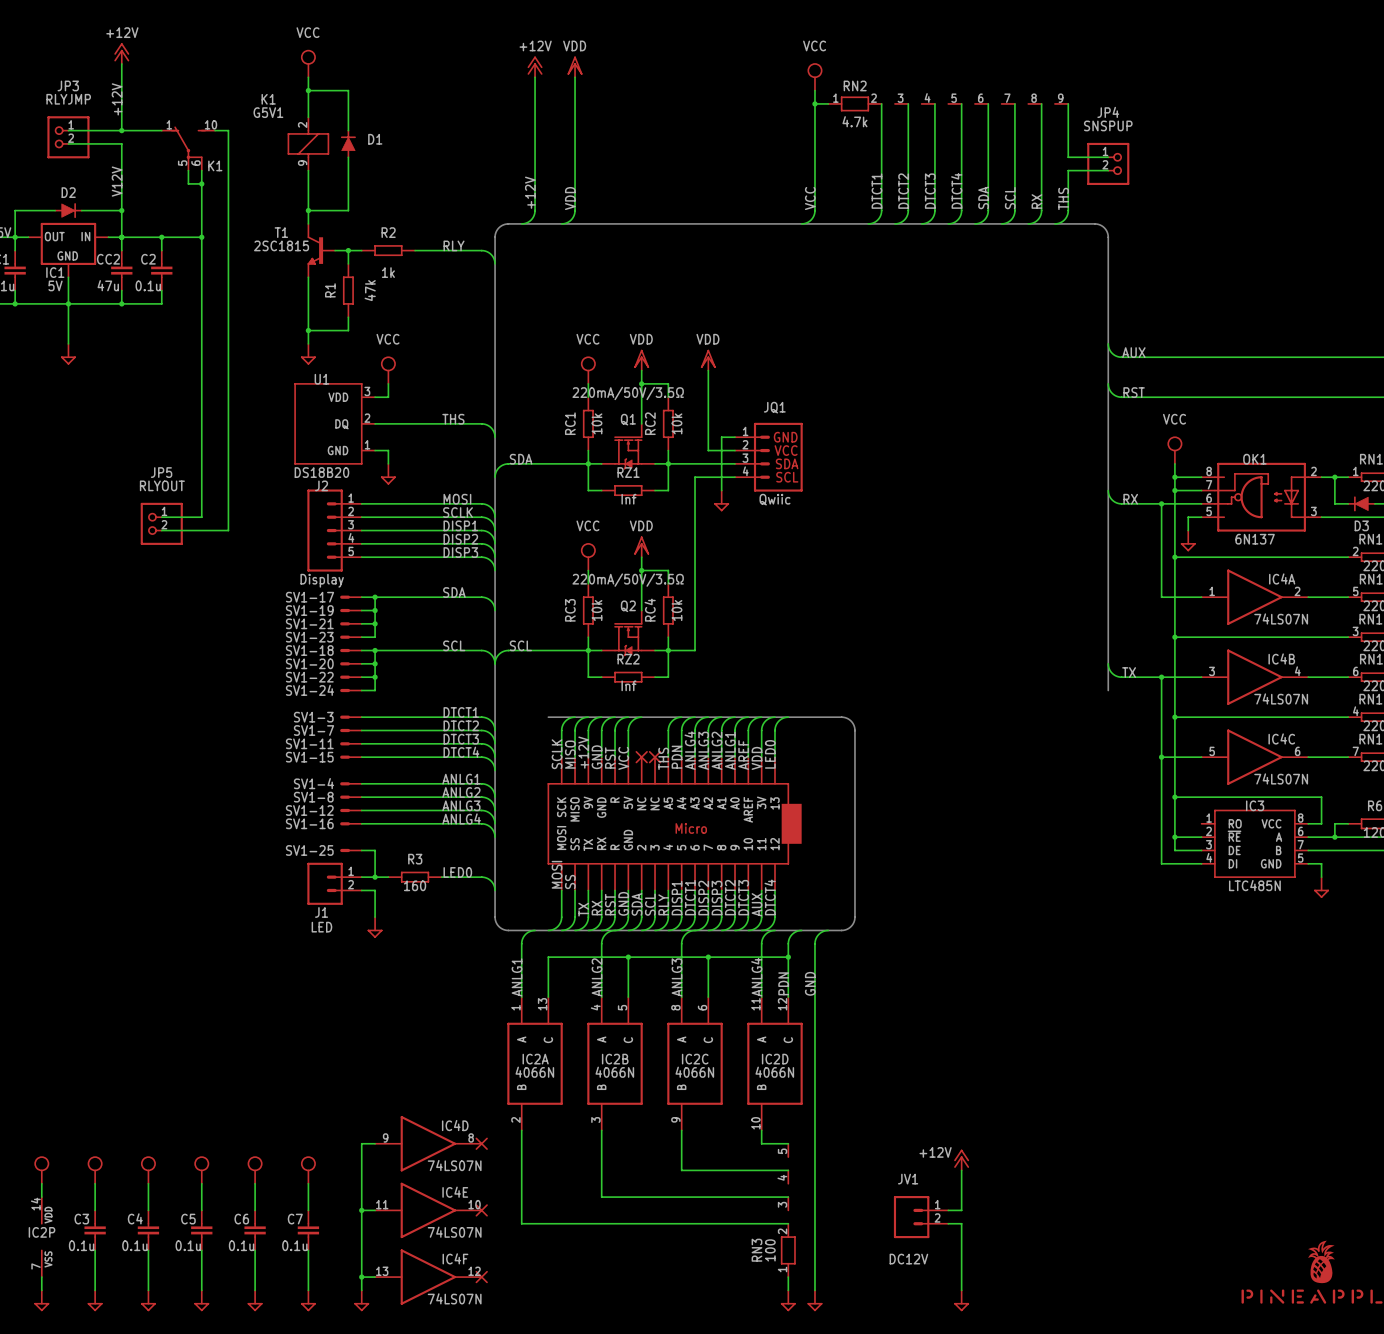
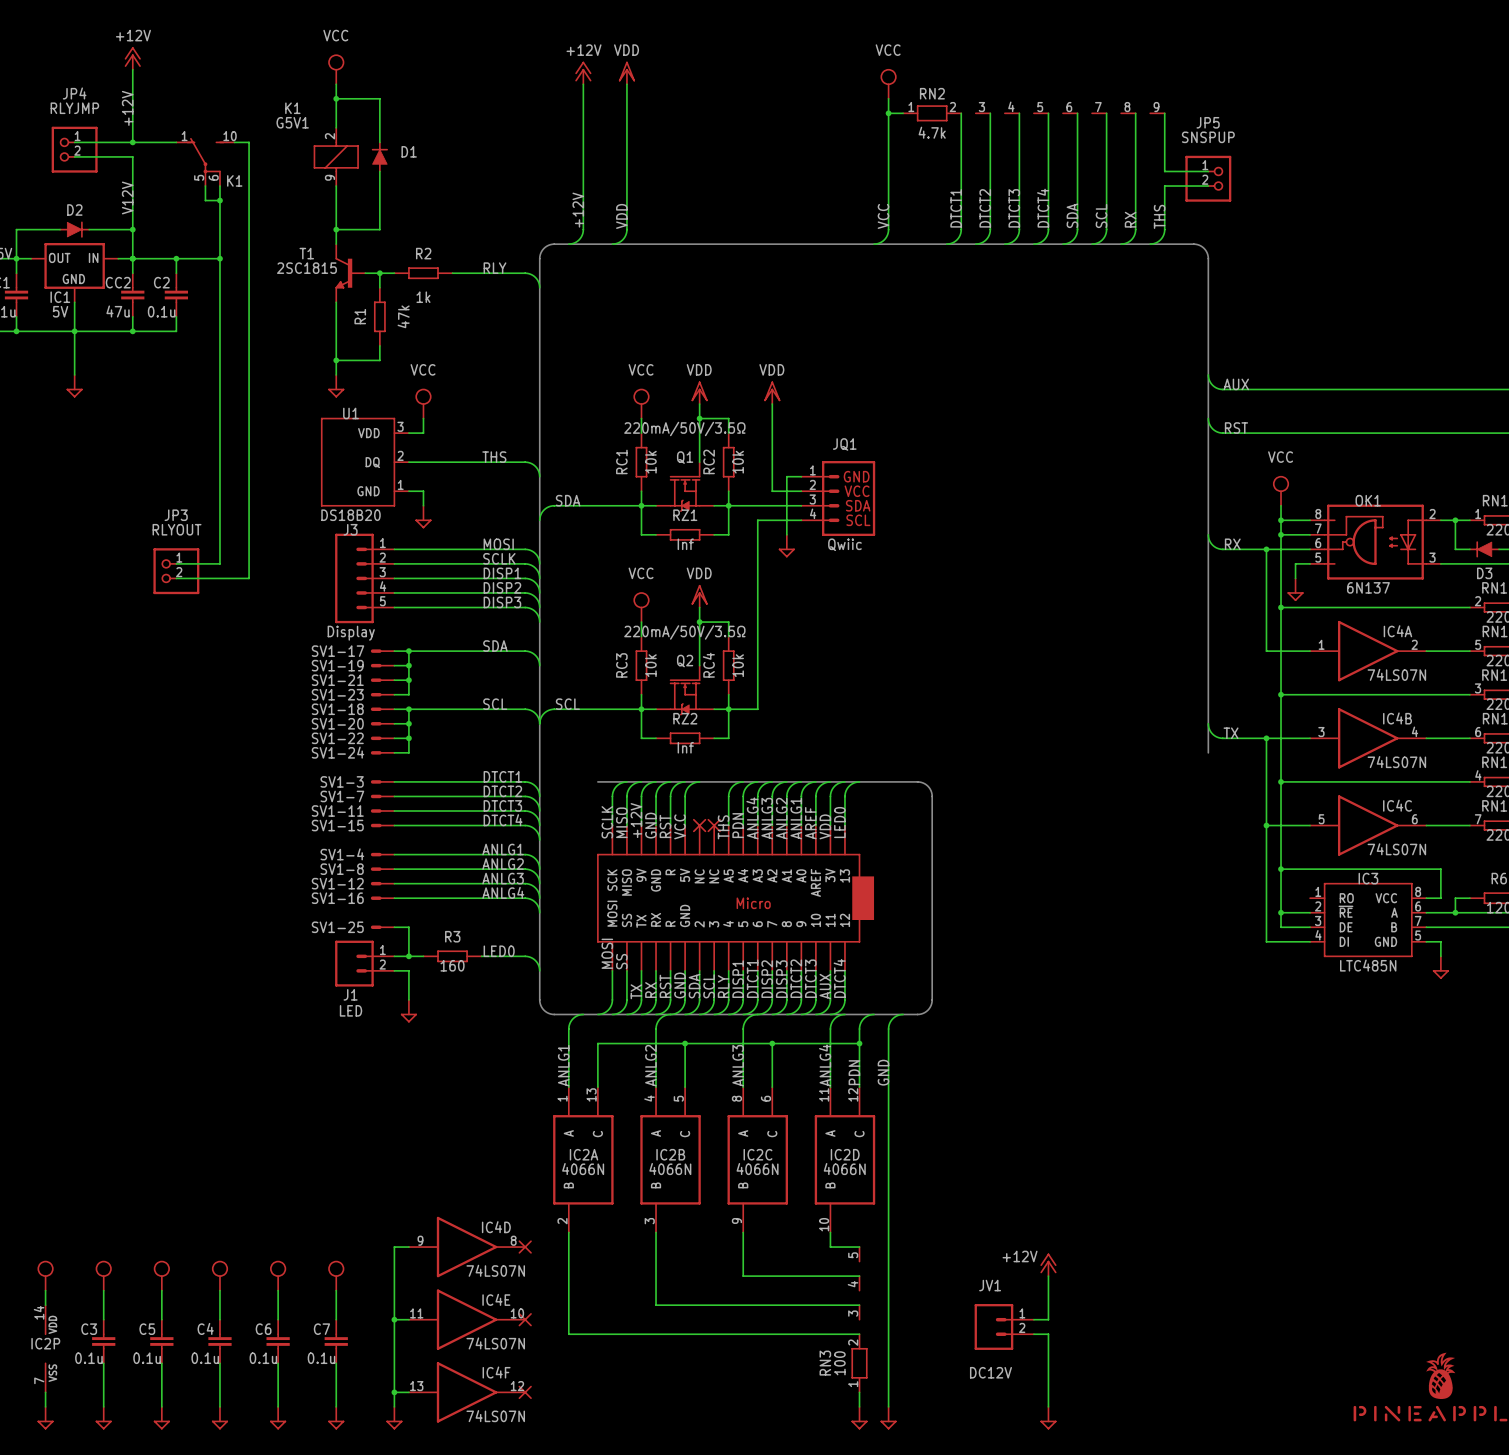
JP3 name: JP3 (68, 85) -> JP4 (74, 93)
JP4 name: JP4 (1108, 112) -> JP5 (1208, 122)
JP5 name: JP5 (161, 472) -> JP3 (176, 515)
J2 name: J2 (321, 485) -> J3 (350, 529)
C4 name: C4 (135, 1218) -> C5 (147, 1329)
C5 name: C5 (188, 1219) -> C4 (205, 1328)

